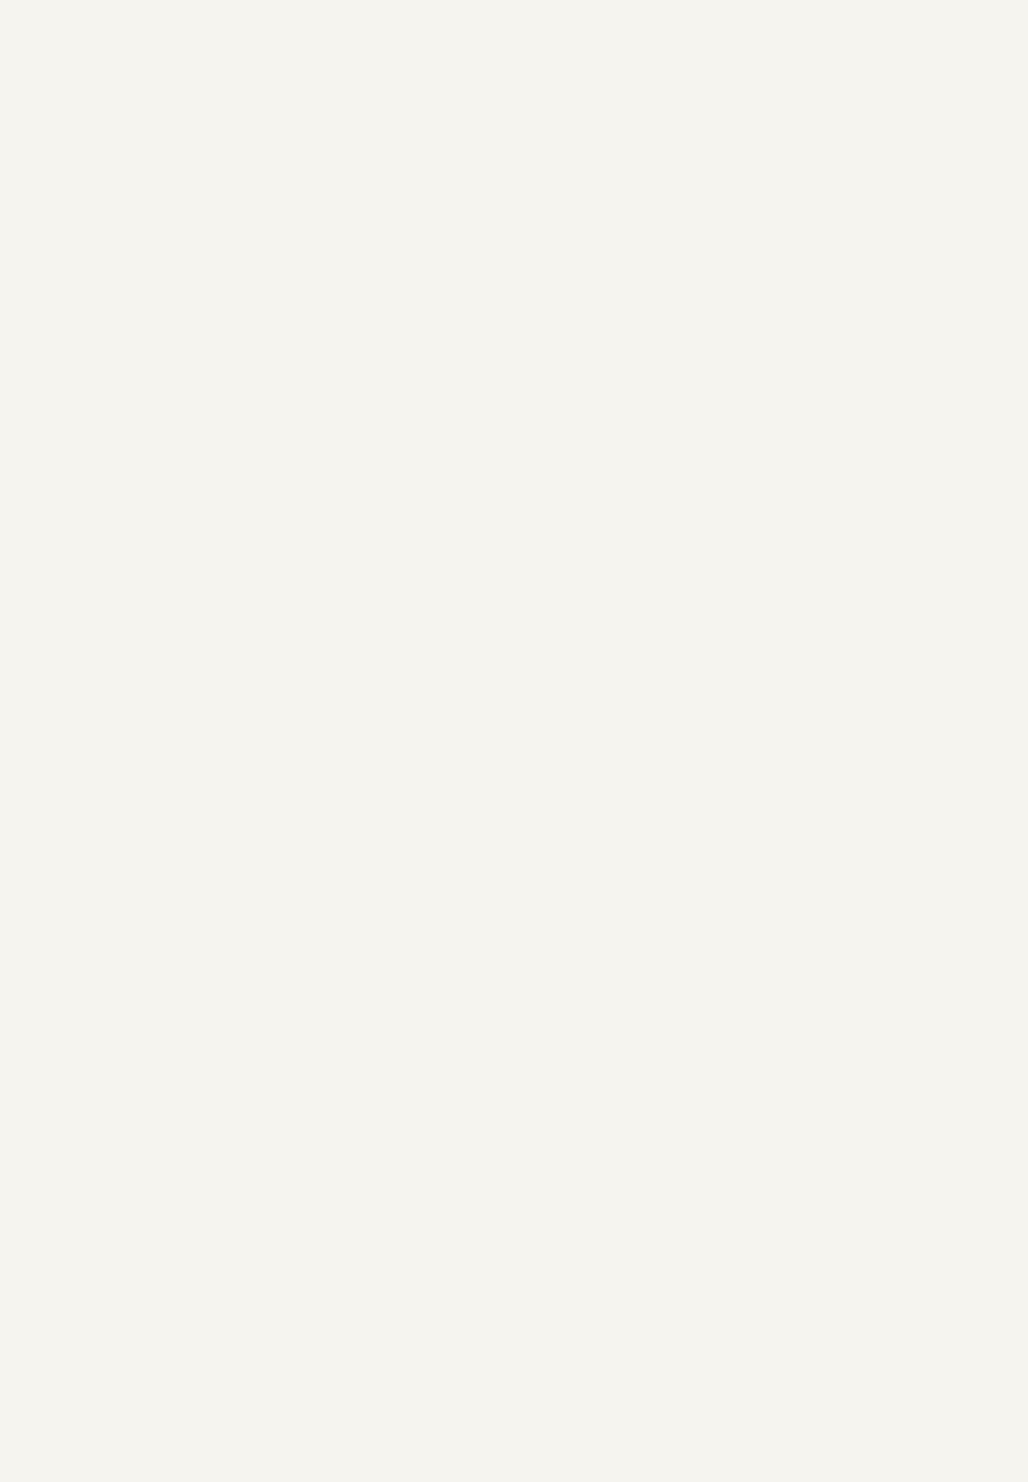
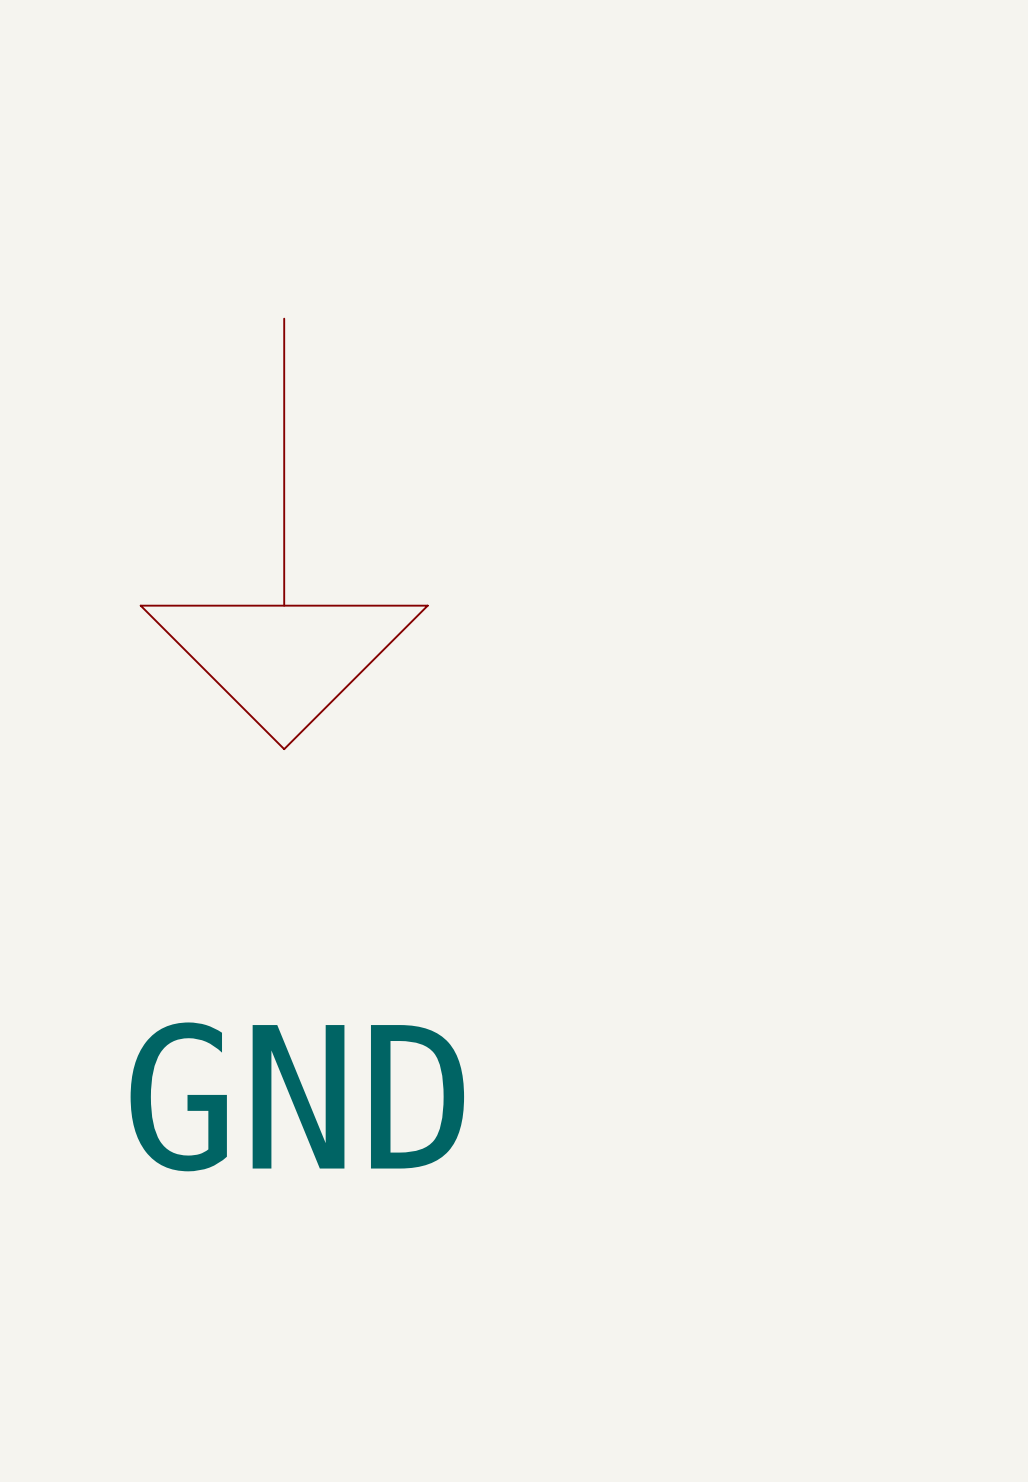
power symbol: none -> GND (284, 533)

